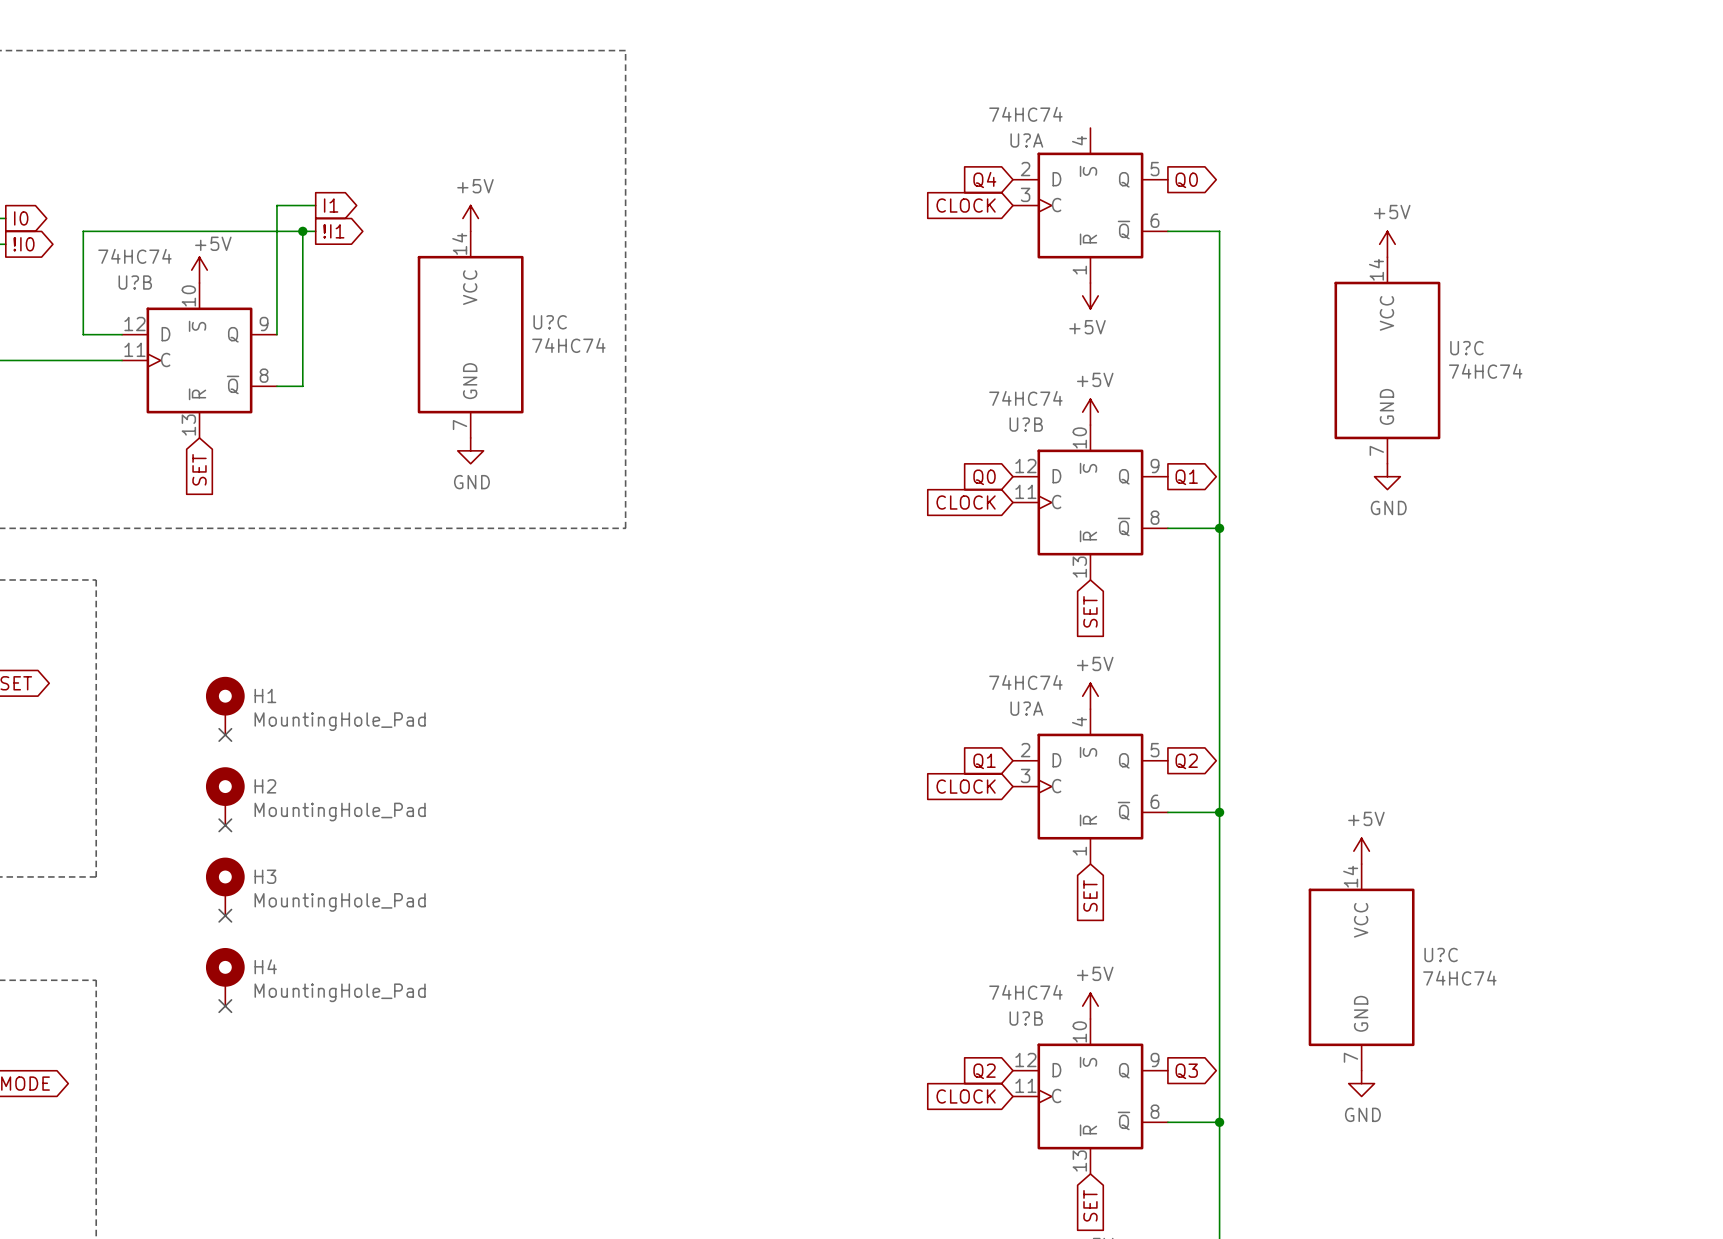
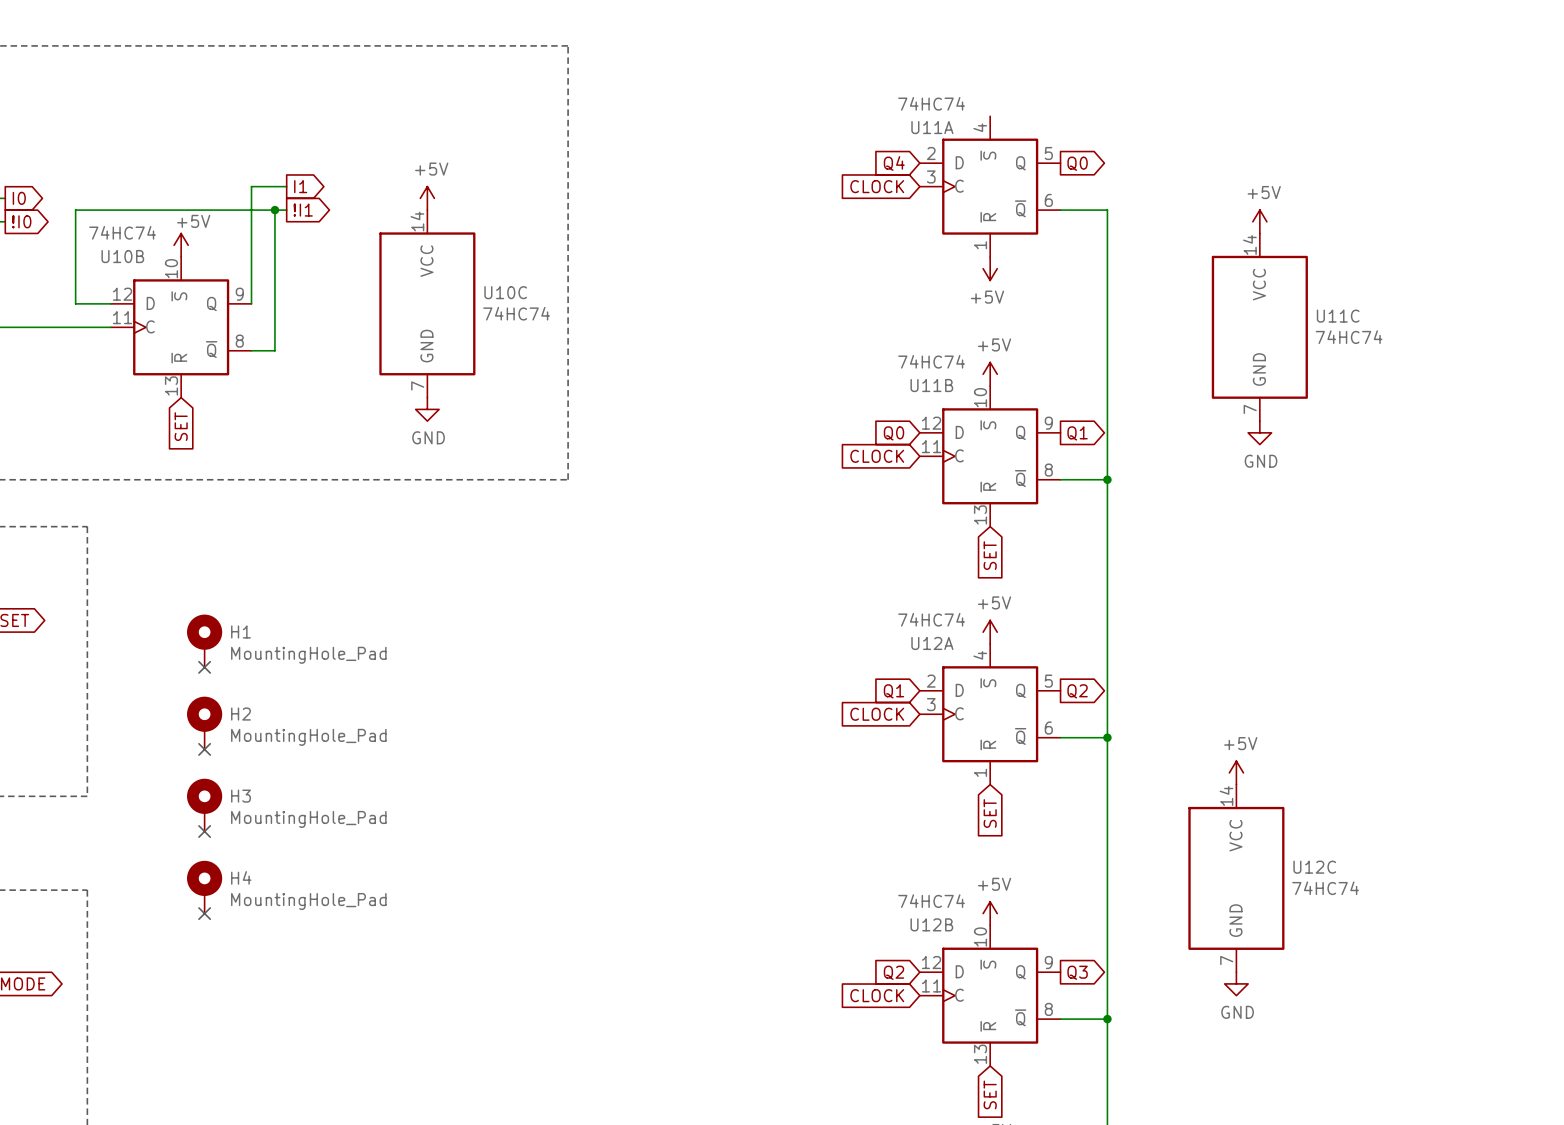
U?A name: U?A (1026, 140) -> U11A (932, 127)
U?B name: U?B (135, 282) -> U10B (122, 256)
U?C name: U?C (550, 322) -> U10C (505, 292)
U?C name: U?C (1466, 348) -> U11C (1338, 316)
U?B name: U?B (1026, 424) -> U11B (931, 385)
U?A name: U?A (1026, 708) -> U12A (932, 643)
U?C name: U?C (1441, 955) -> U12C (1314, 867)
U?B name: U?B (1026, 1018) -> U12B (931, 924)

